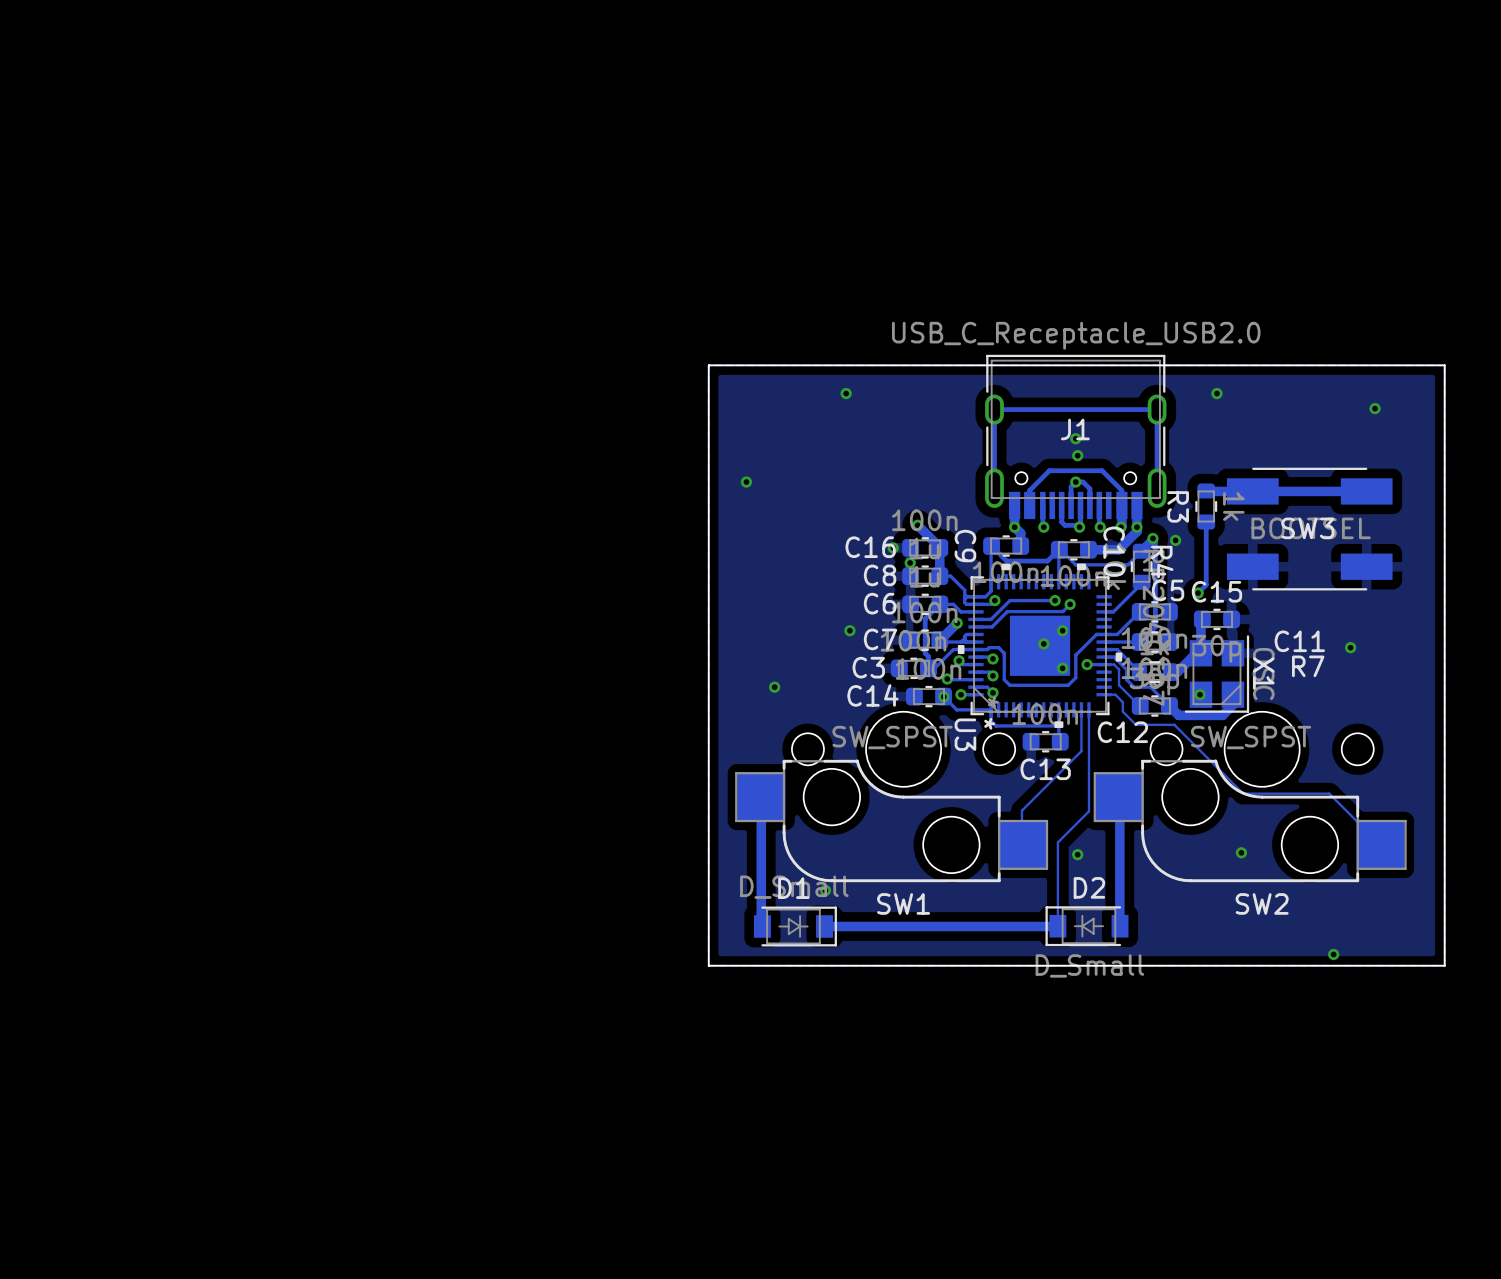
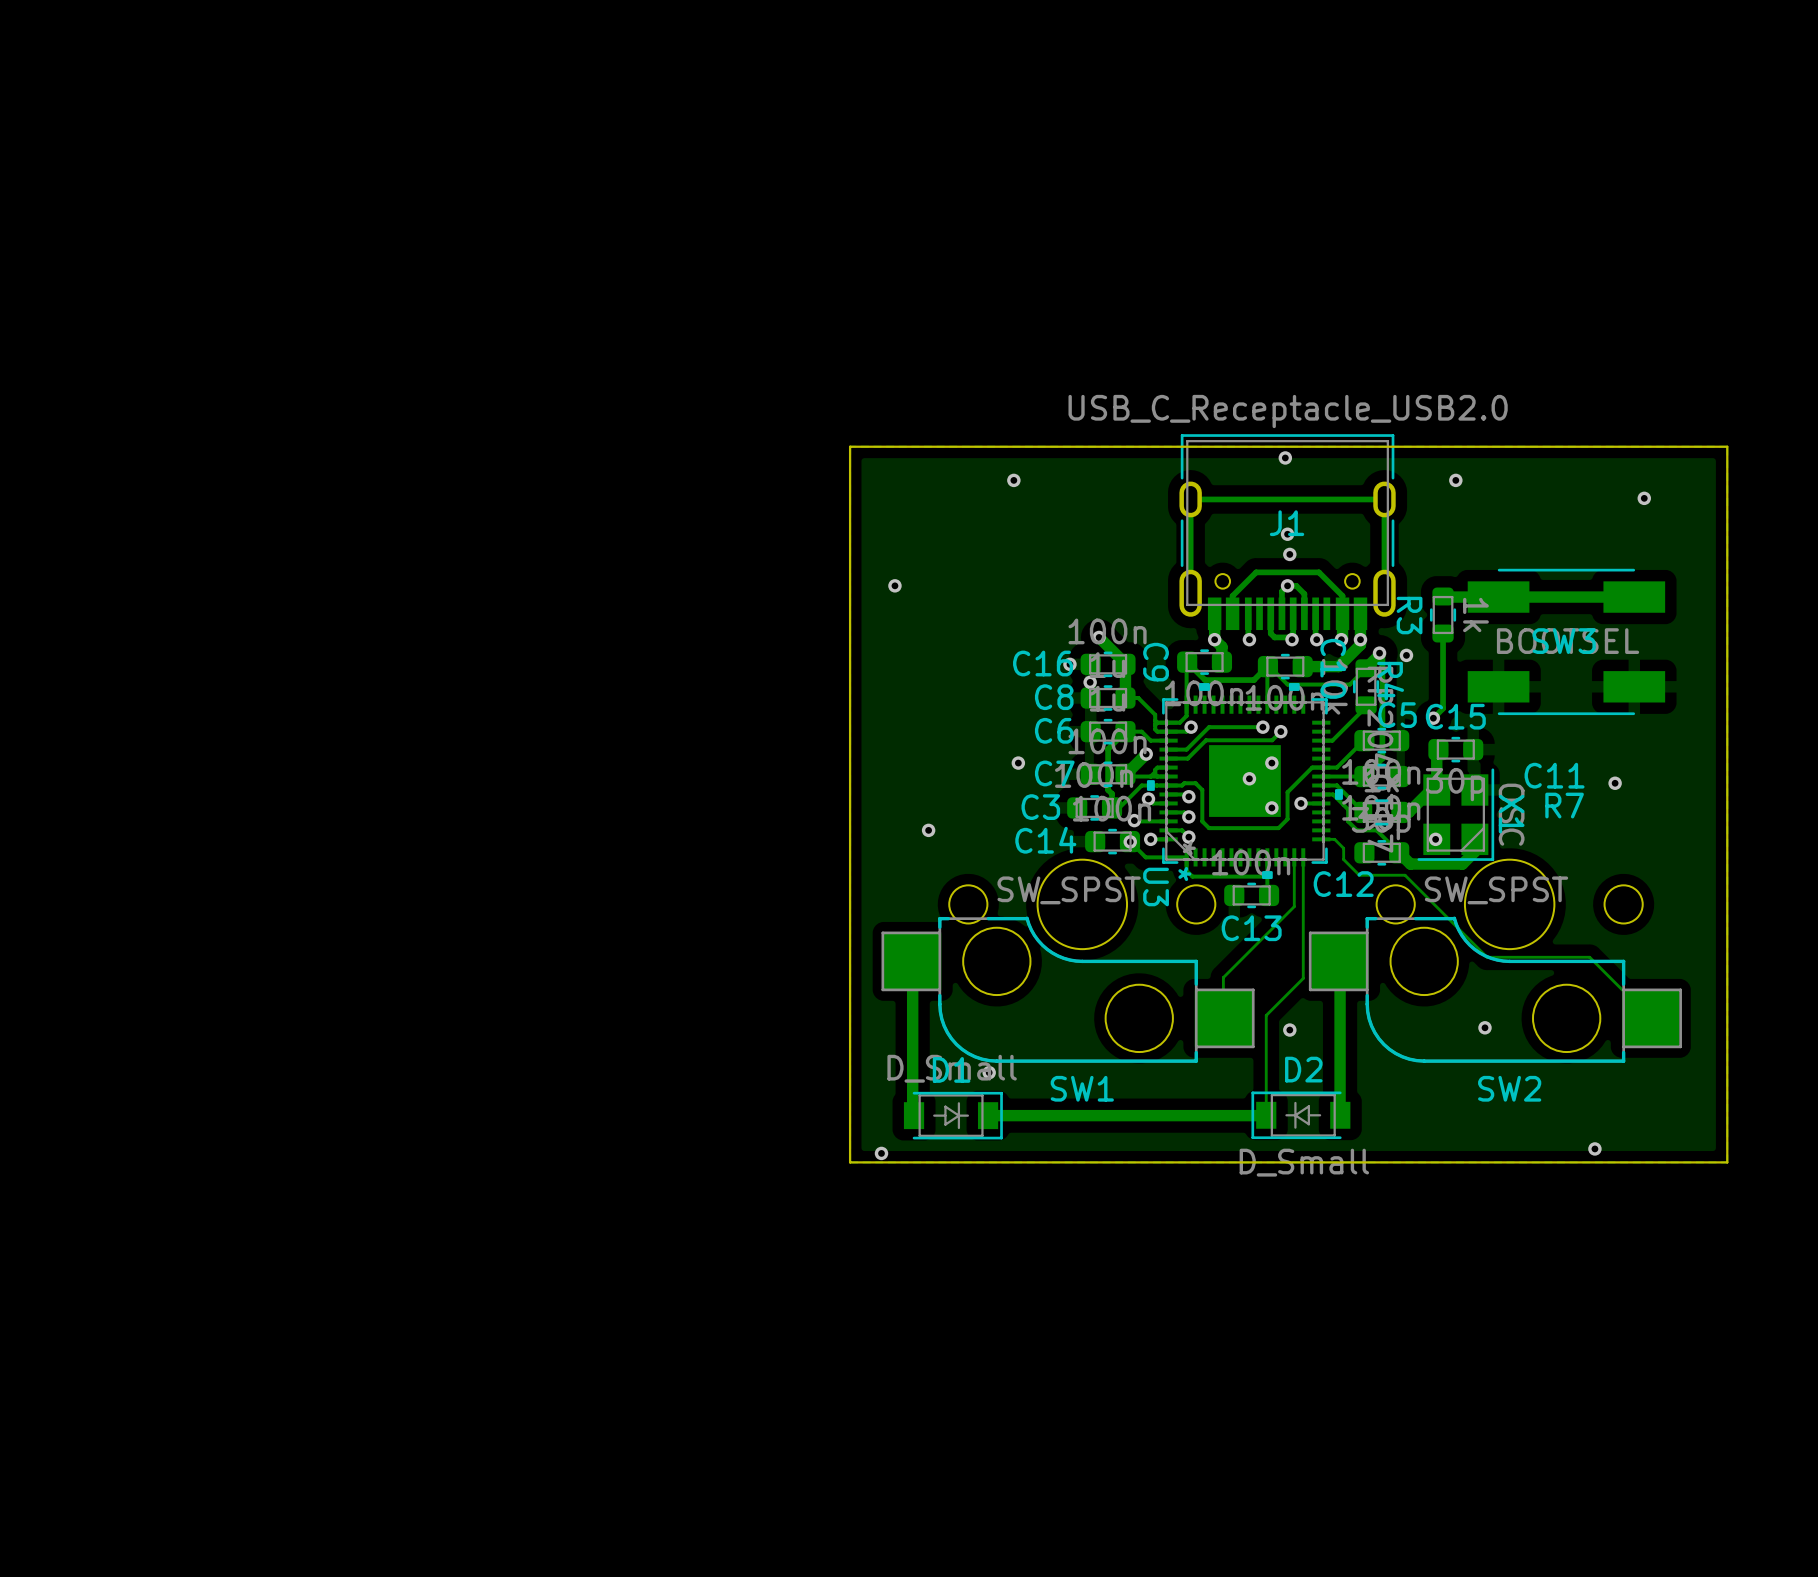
via: none -> (1285, 457)
track: (1104, 664) (1114, 664) (1119, 669) (1119, 685) (1140, 706) -> none
via: none -> (881, 1153)

